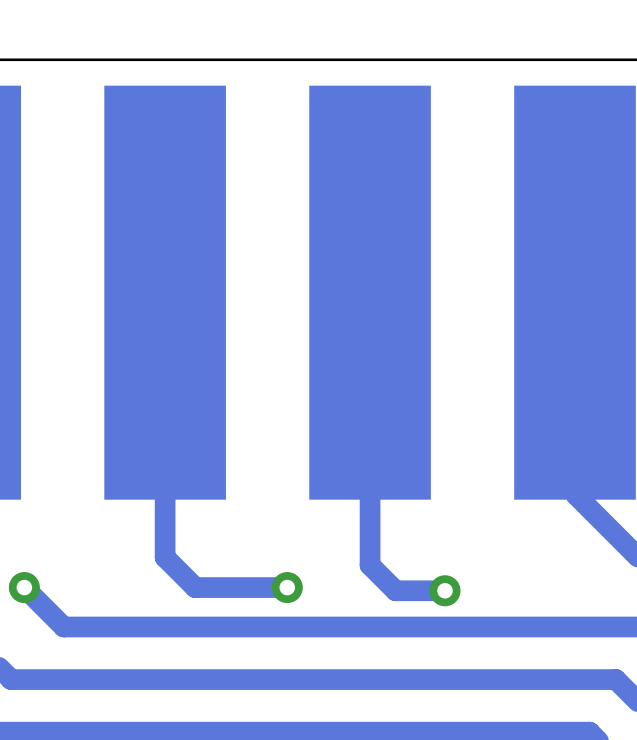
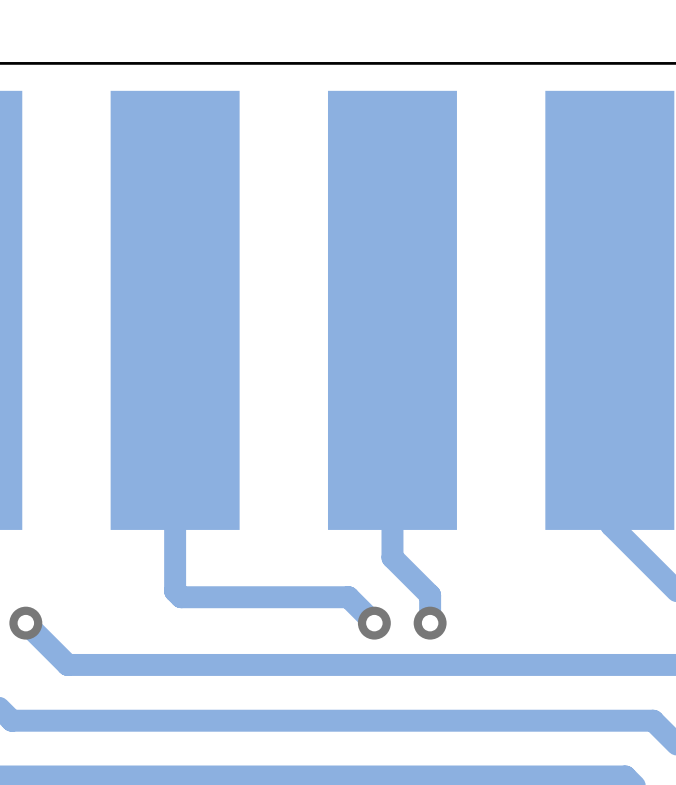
track: (370, 525) (370, 565) (395, 590) (445, 590) -> (392, 557) (430, 595) (430, 623)
track: (170, 563) (195, 587) (287, 587) -> (181, 597) (348, 597) (374, 623)
via: (287, 587) -> none
via: none -> (374, 623)
via position: (445, 590) -> (430, 623)

